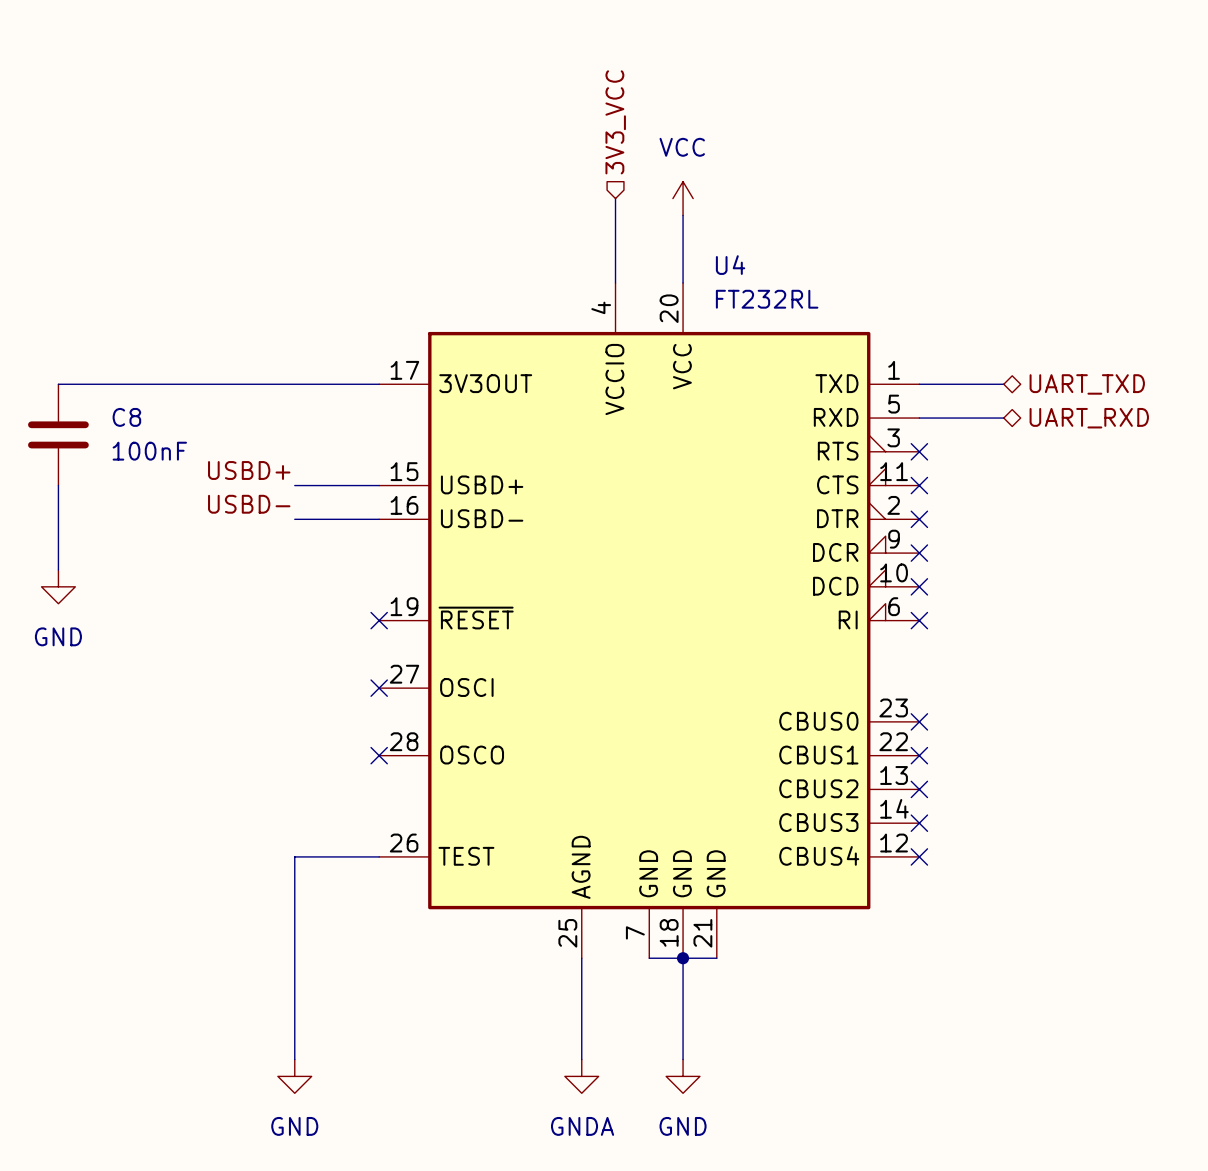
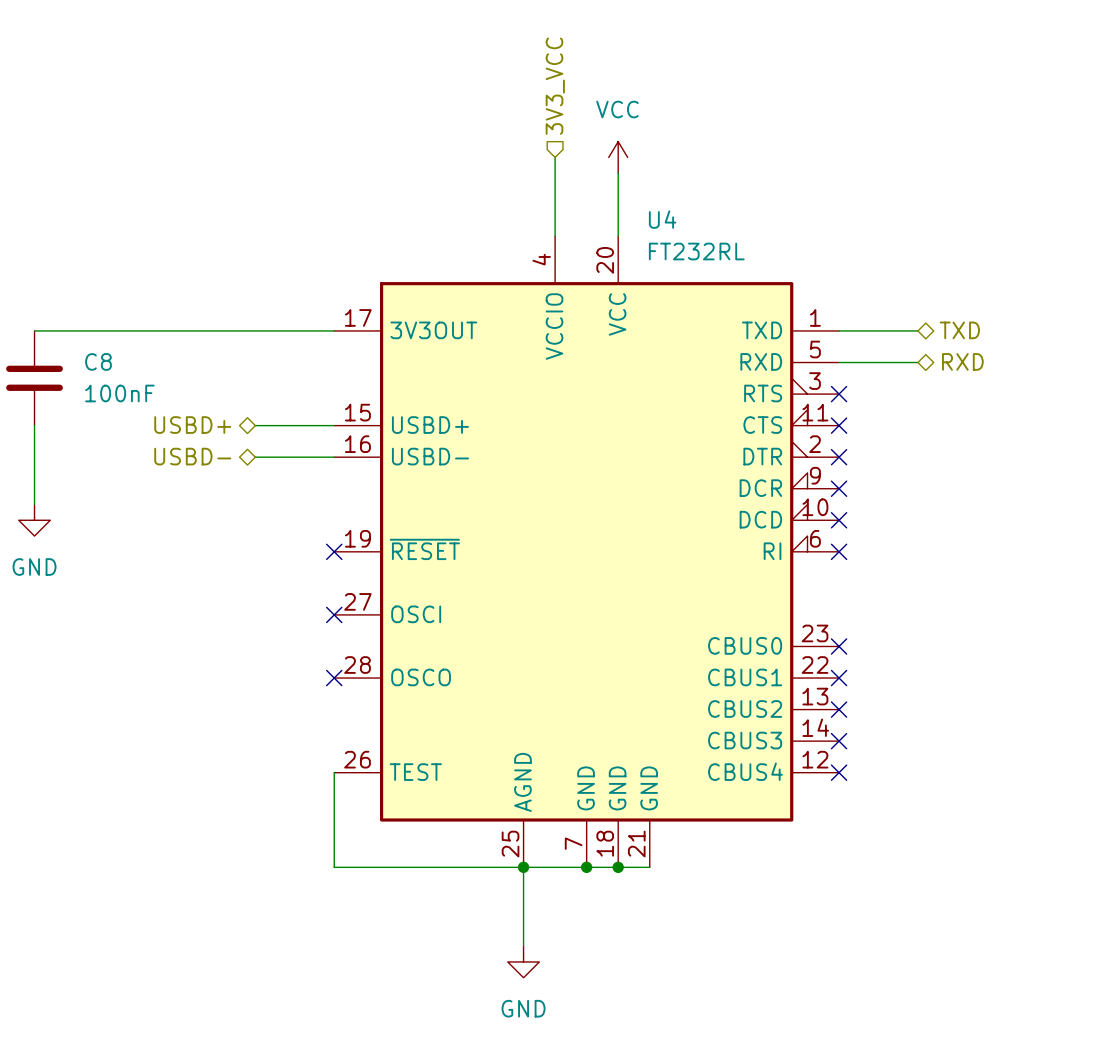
hierarchical label: UART_TXD (1087, 384) -> TXD (959, 330)
hierarchical label: UART_RXD (1089, 418) -> RXD (962, 361)
label: USBD+ (249, 470) -> none
hierarchical label: none -> USBD+ (192, 425)
label: USBD- (249, 504) -> none
hierarchical label: none -> USBD- (192, 456)
wire: (379, 856) (294, 856) (294, 1059) -> (334, 772) (334, 867) (586, 867)
junction: none -> (523, 867)
junction: none -> (586, 867)
wire: (683, 958) (683, 1059) -> none
power symbol: GND (294, 1076) -> none
power symbol: GNDA (581, 1076) -> none
power symbol position: GND (683, 1076) -> GND (523, 961)

